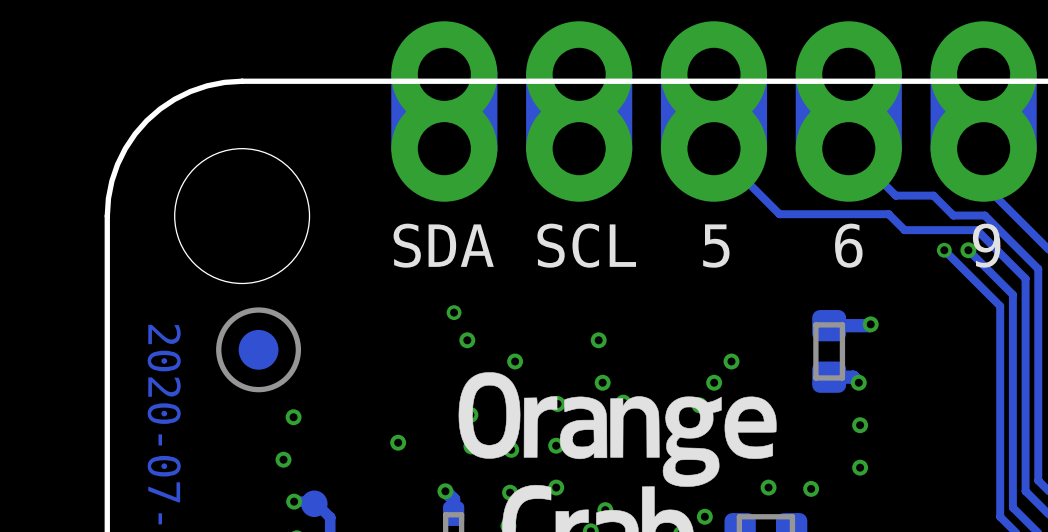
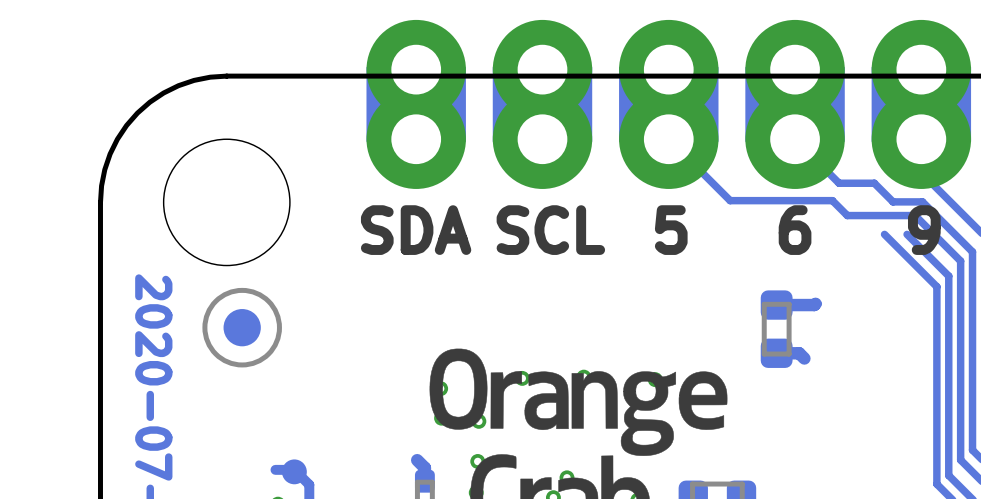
via: (944, 250) -> none
via: (968, 250) -> none
via: (454, 312) -> none
via: (870, 324) -> none
via: (467, 340) -> none
via: (598, 340) -> none
via: (515, 361) -> none
via: (731, 361) -> none
via: (602, 382) -> none
via: (714, 382) -> none
via: (858, 382) -> none
via: (293, 417) -> none
via: (860, 425) -> none
via: (398, 442) -> none
via: (556, 445) -> none
via: (283, 459) -> none
via: (860, 467) -> none
via: (556, 487) -> none
via: (768, 487) -> none
via: (811, 488) -> none
via: (445, 491) -> none
via: (294, 501) -> none
via: (704, 516) -> none

